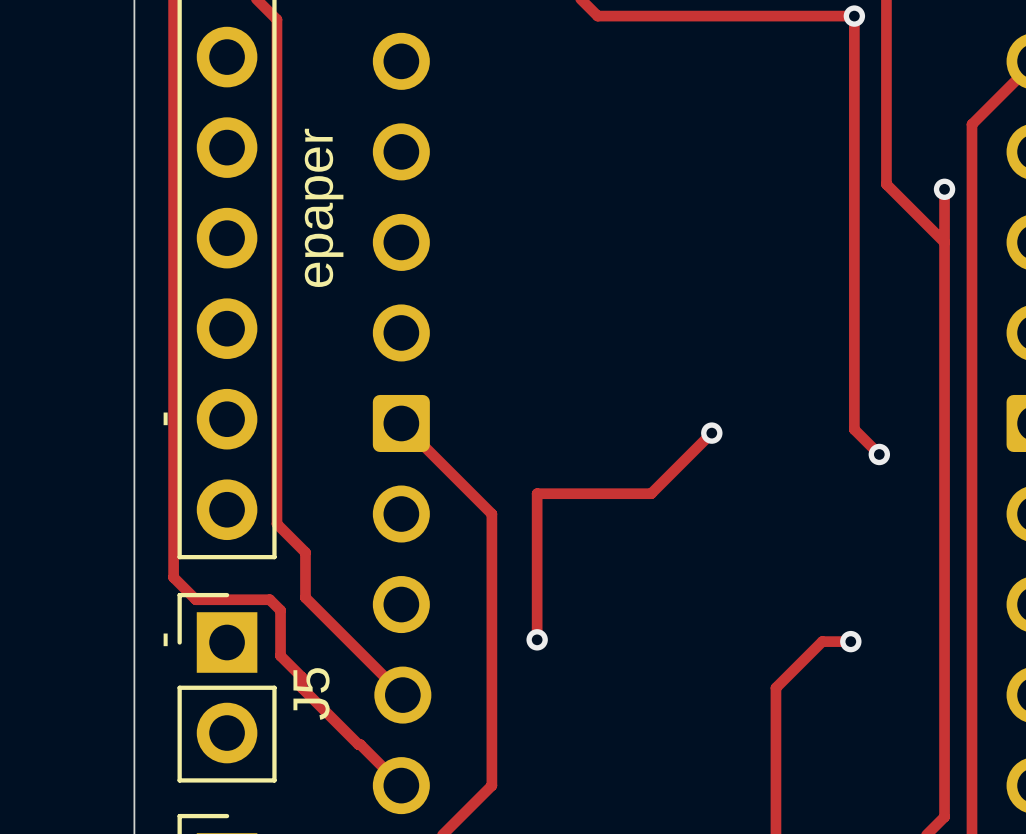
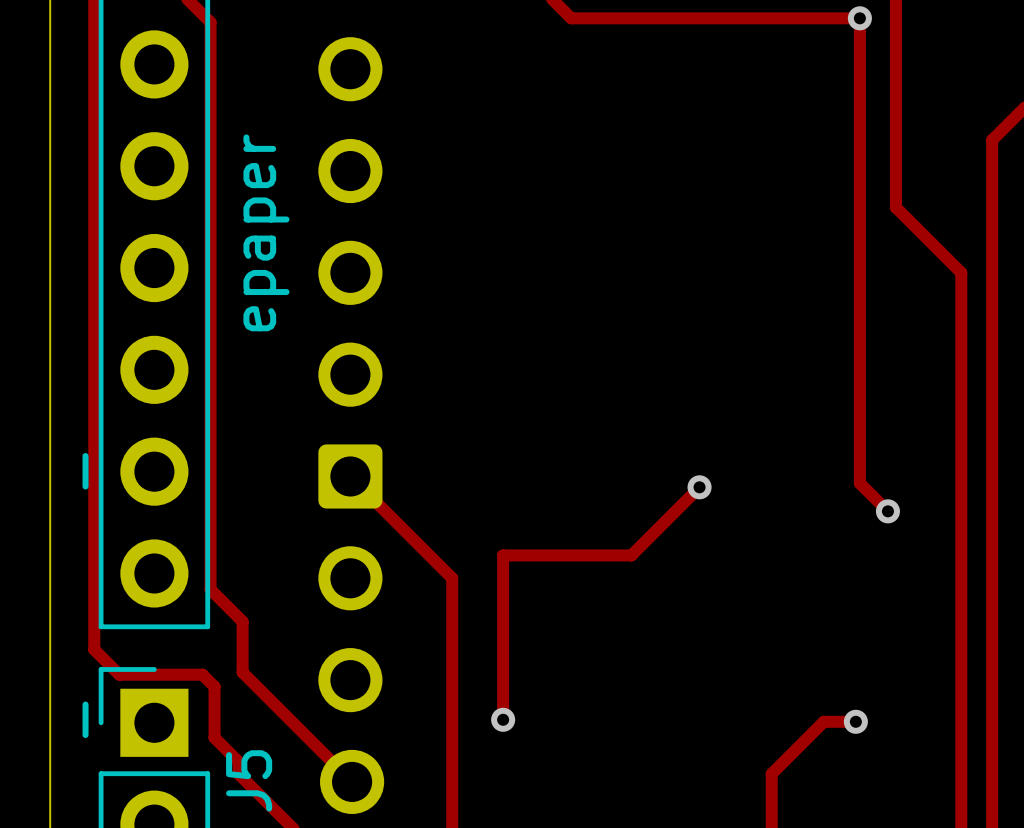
track: (944, 189) (944, 242) -> none
via: (944, 189) -> none

